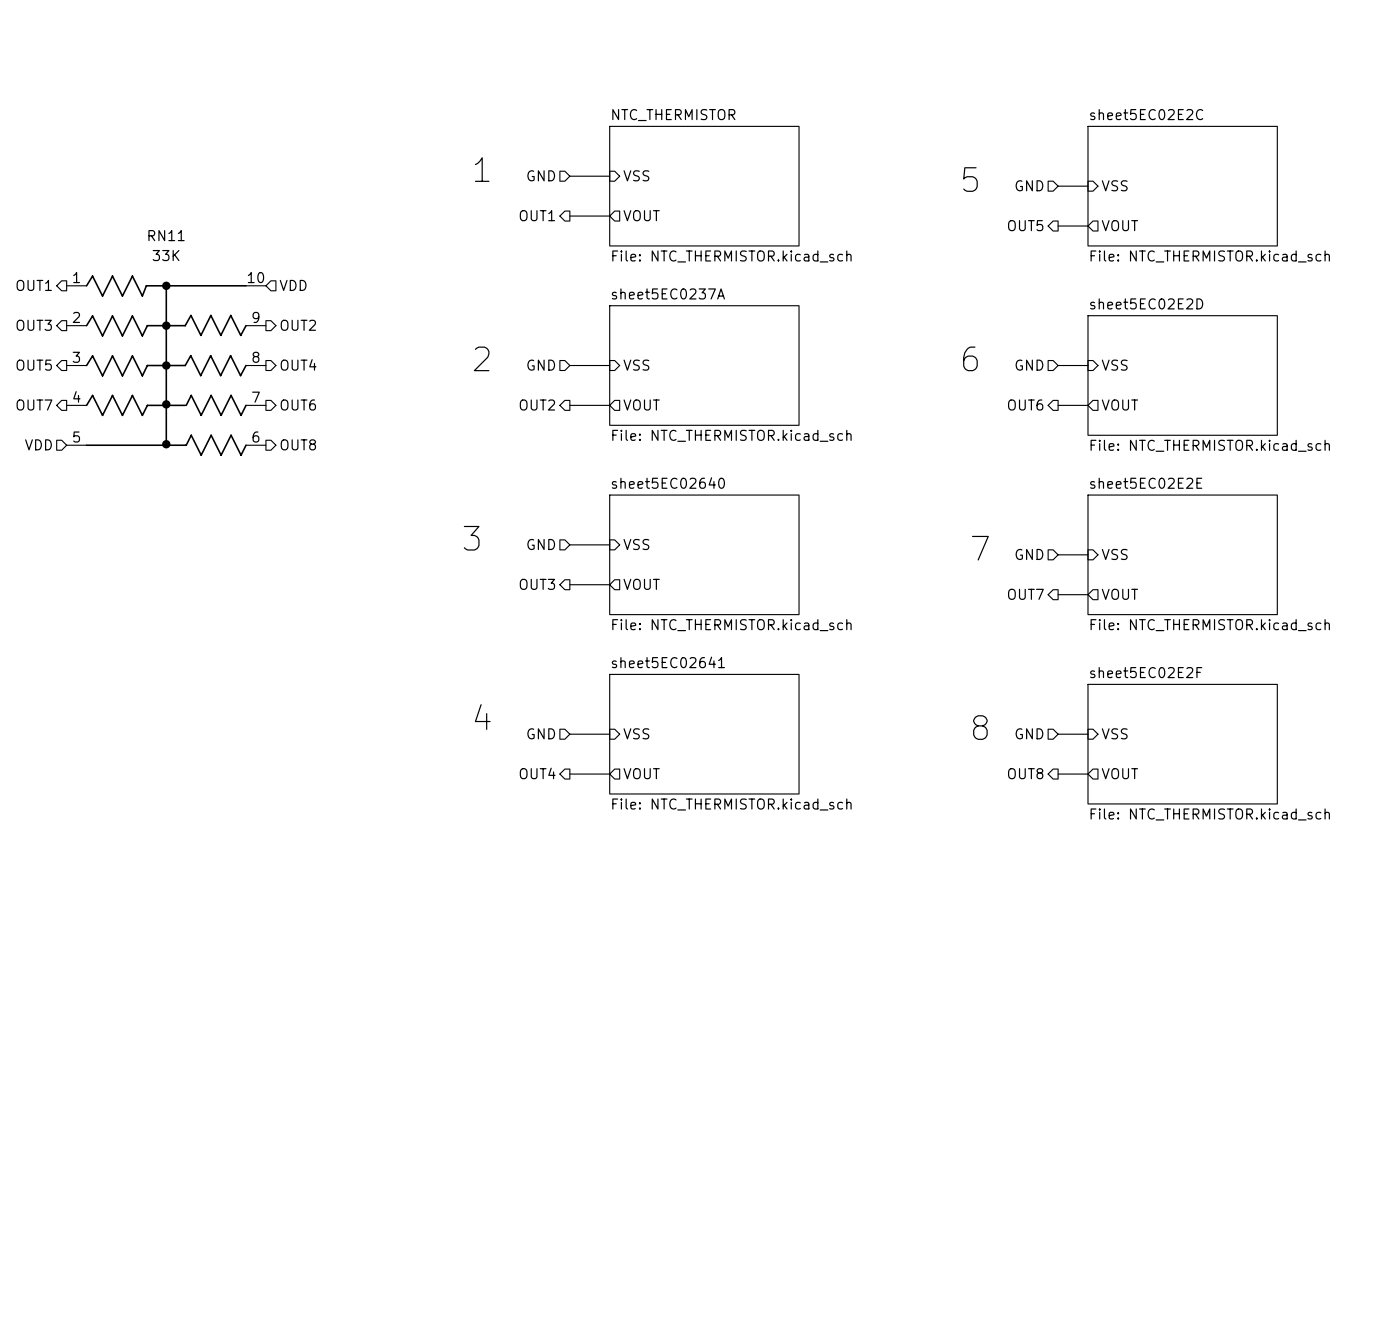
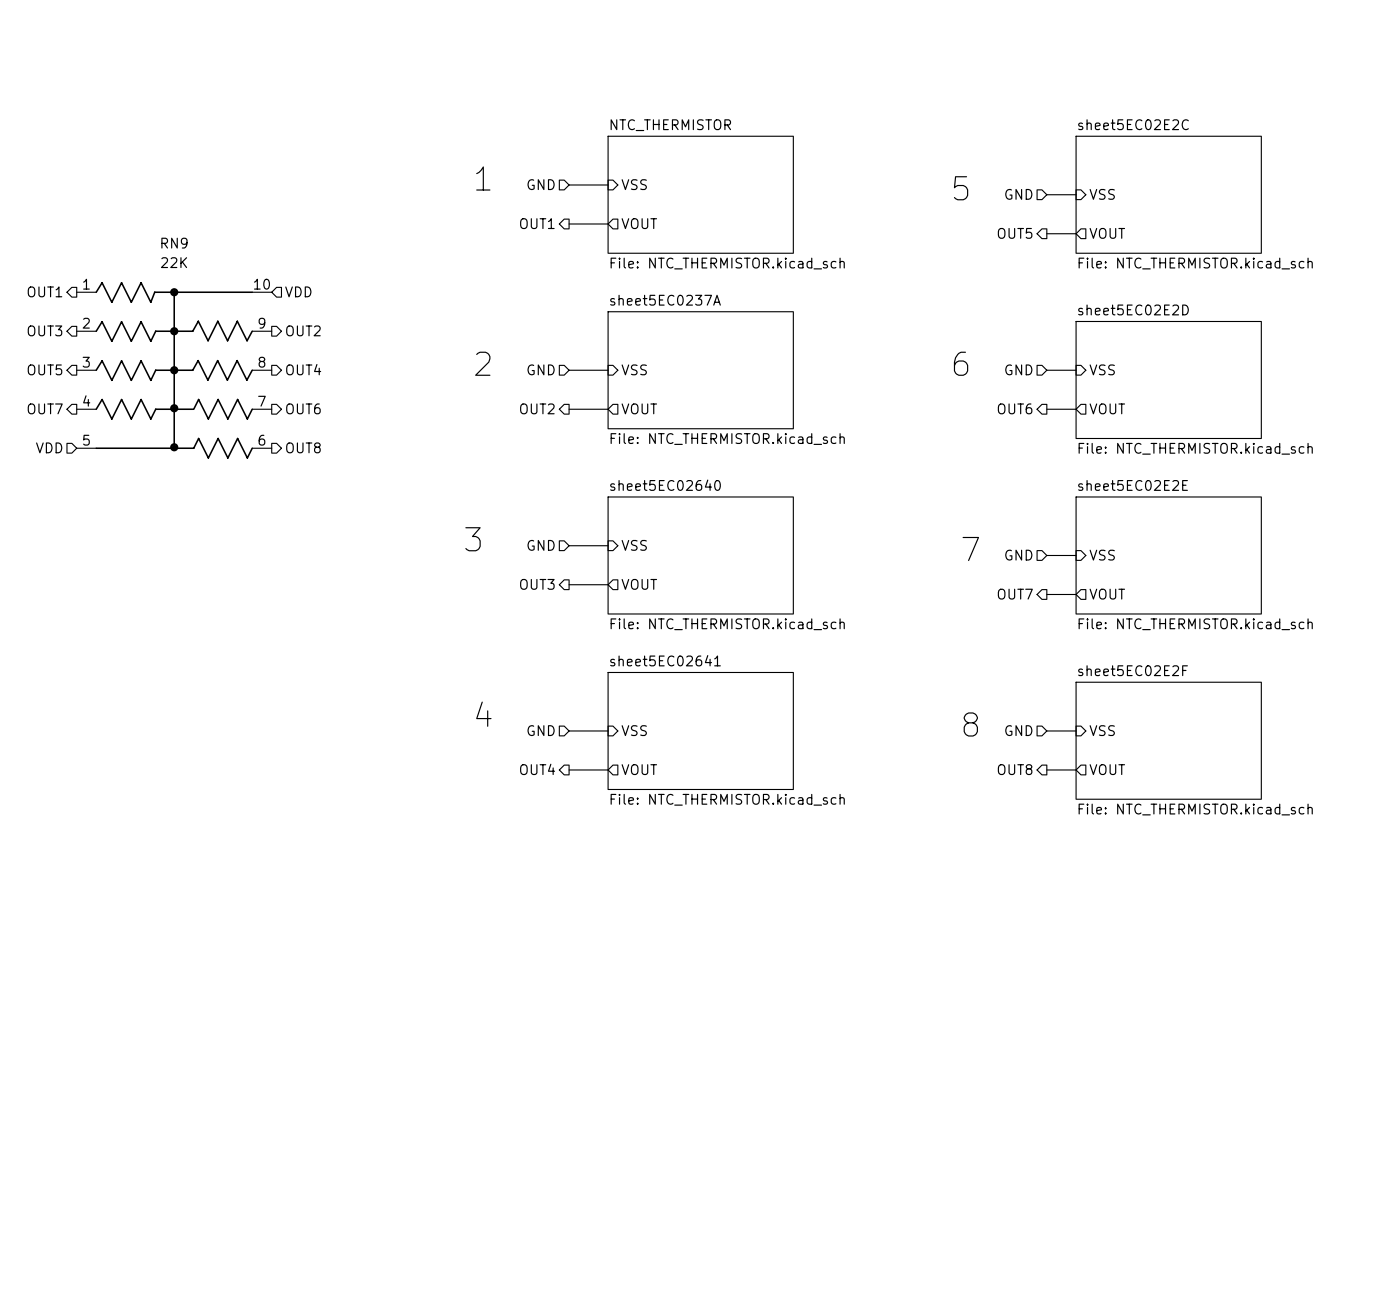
RN11 name: RN11 (166, 235) -> RN9 (174, 243)
RN11 value: 33K (166, 255) -> 22K (173, 262)

